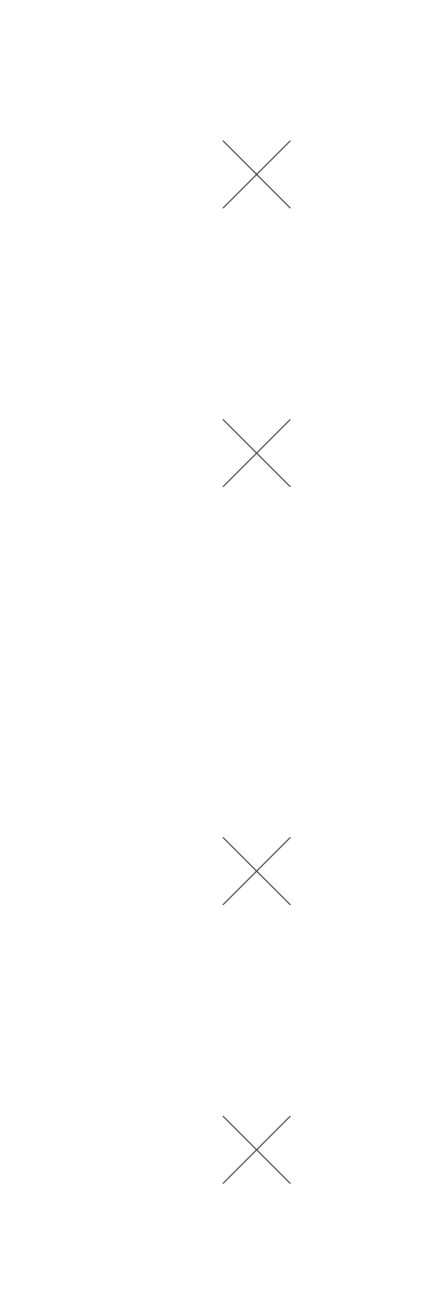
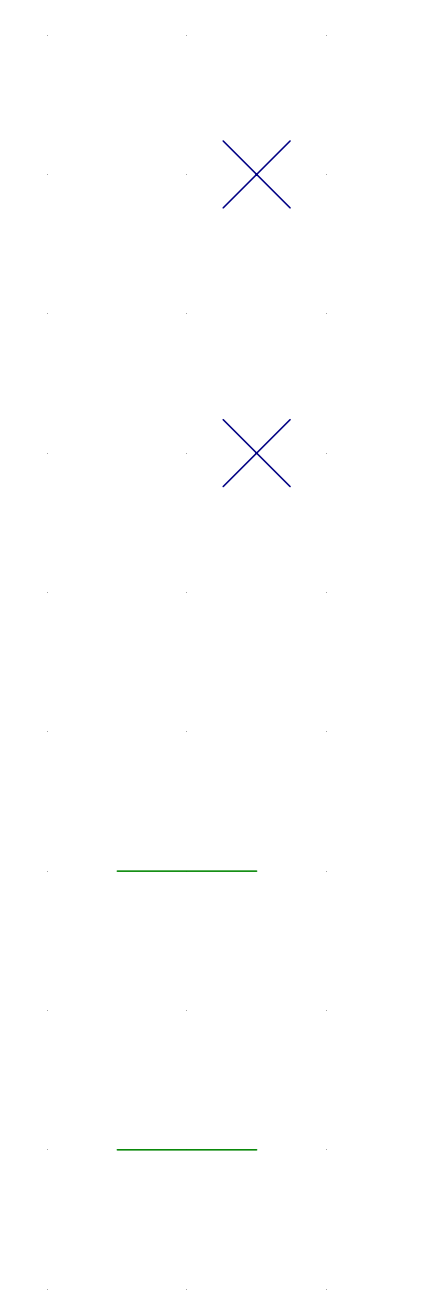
wire: none -> (117, 871) (256, 871)
no-connect mark: (256, 871) -> none
wire: none -> (117, 1149) (256, 1149)
no-connect mark: (256, 1149) -> none

